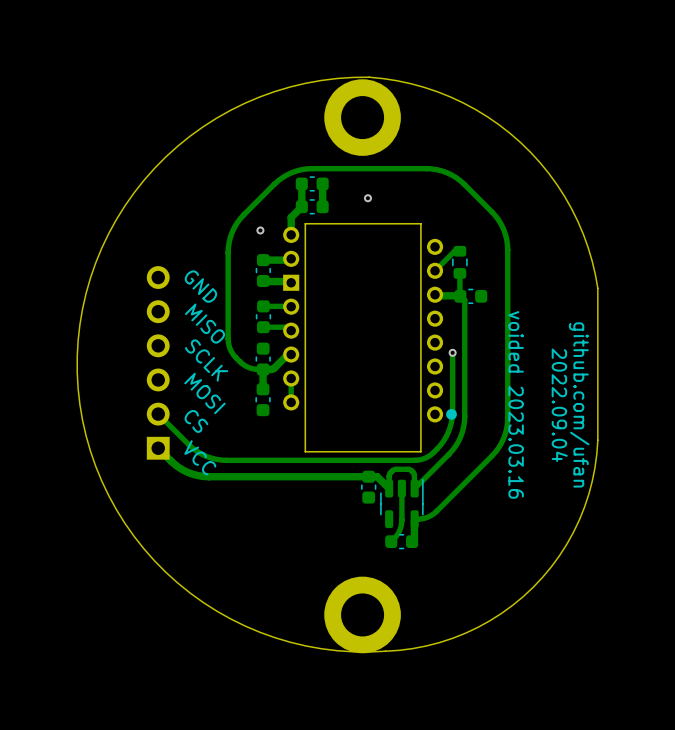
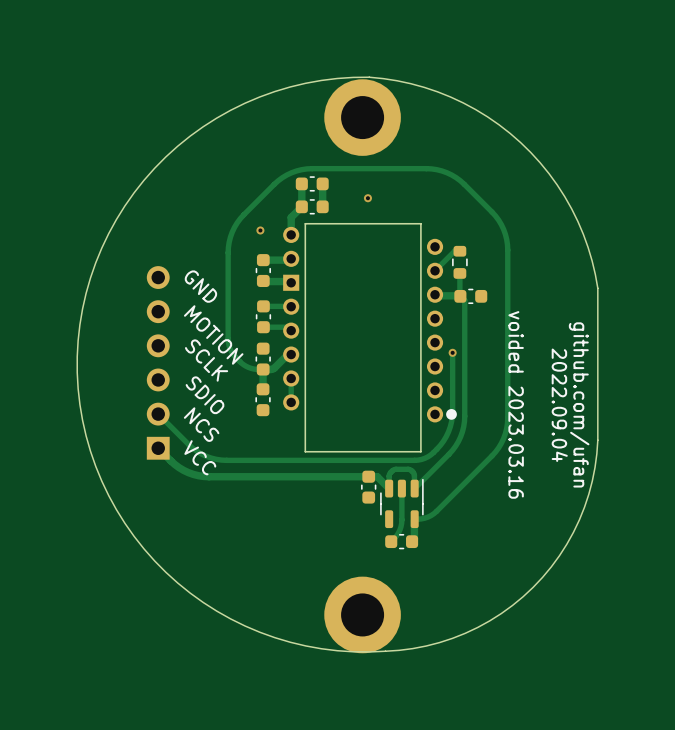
text: MISO (204, 323) -> none
text: none -> MOTION (213, 334)
text: MOSI (204, 393) -> SDIO (204, 395)
text: CS (196, 421) -> NCS (201, 424)

